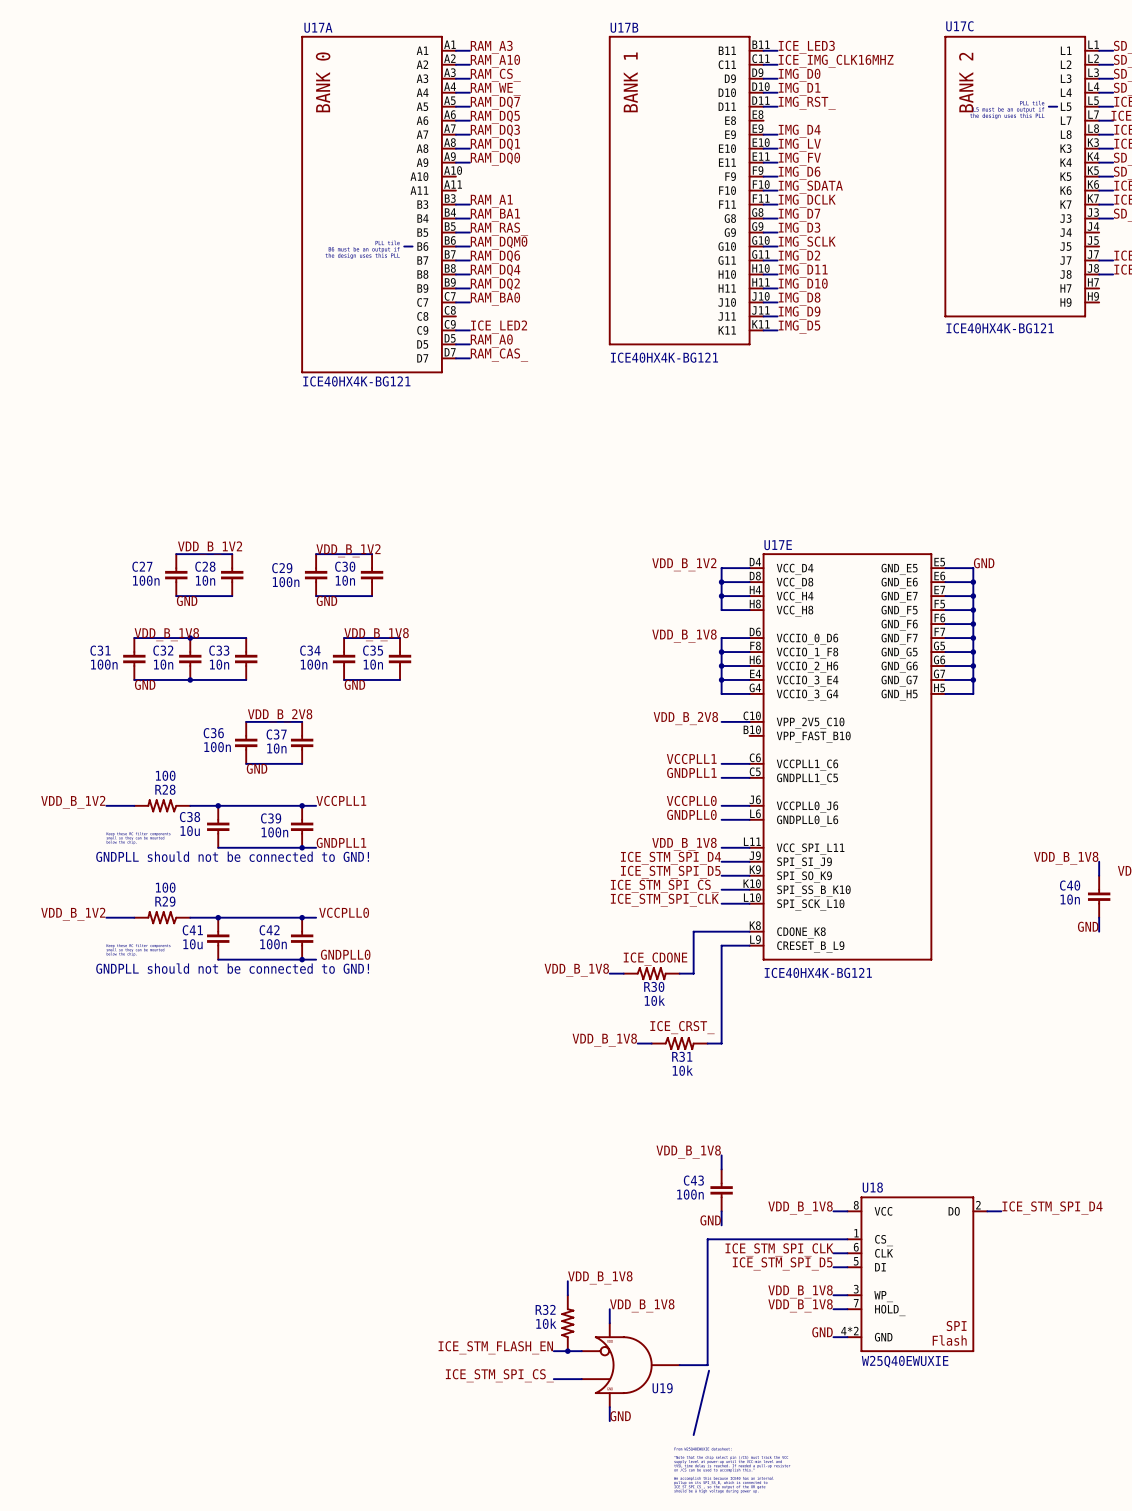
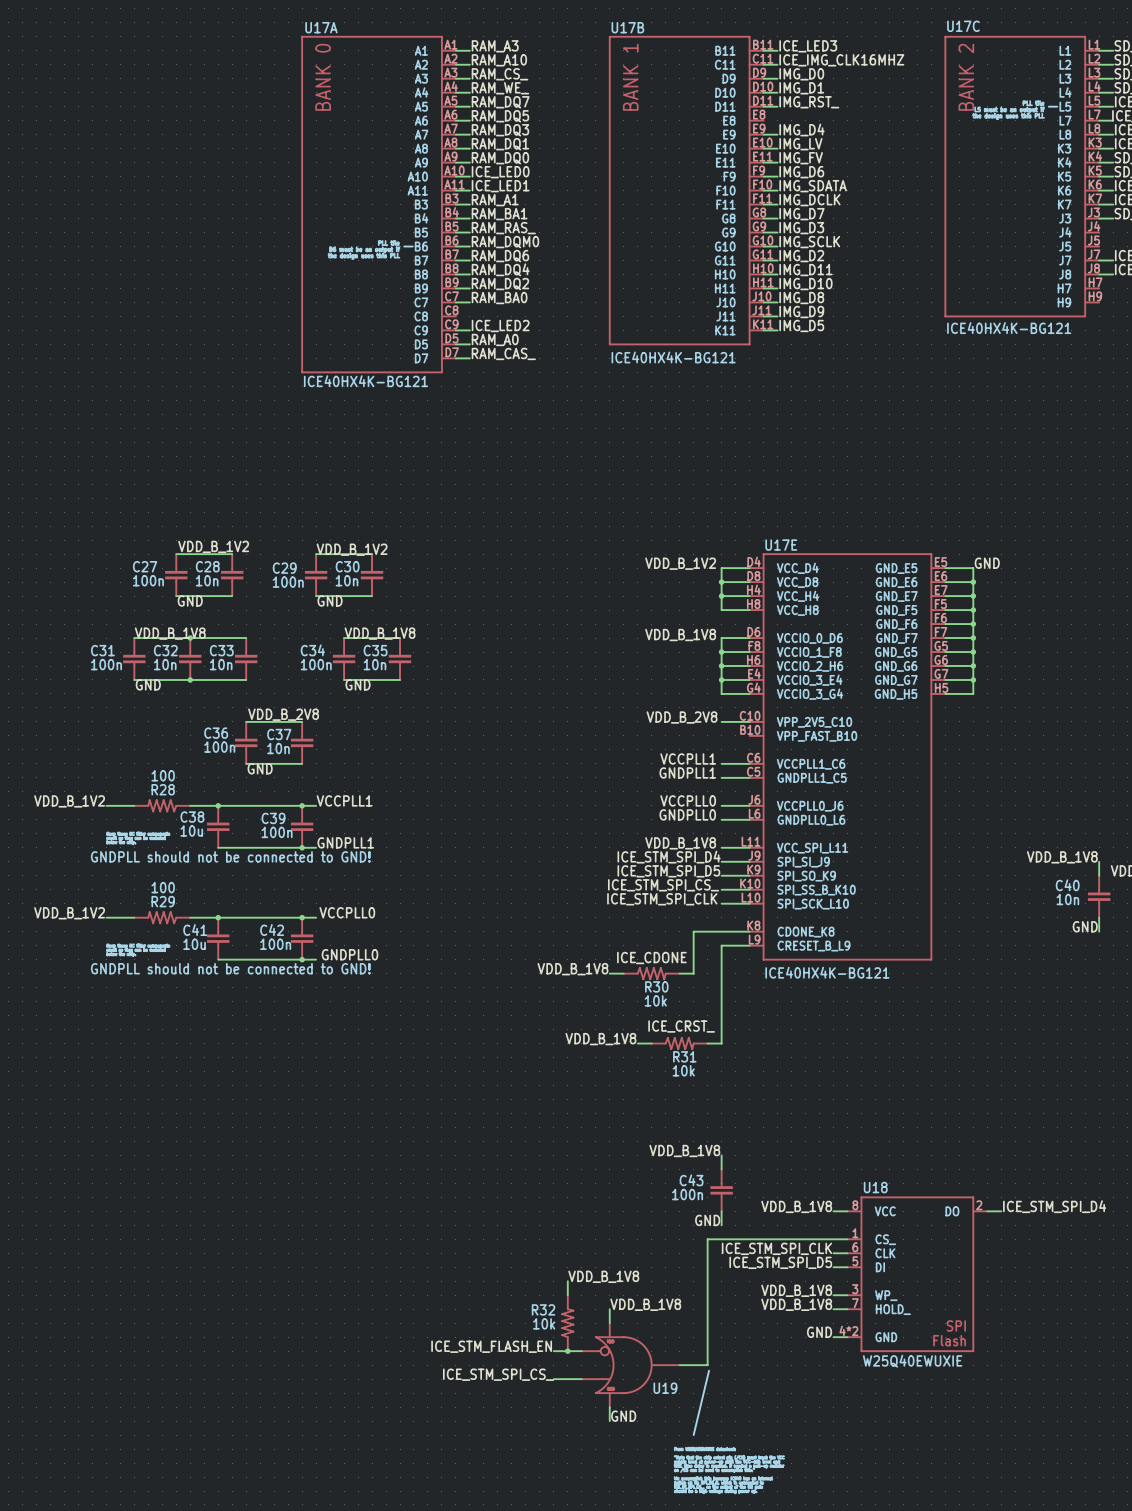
label: none -> ICE_LED0 (500, 172)
wire: none -> (455, 176) (469, 176)
label: none -> ICE_LED1 (500, 186)
wire: none -> (455, 190) (469, 190)

